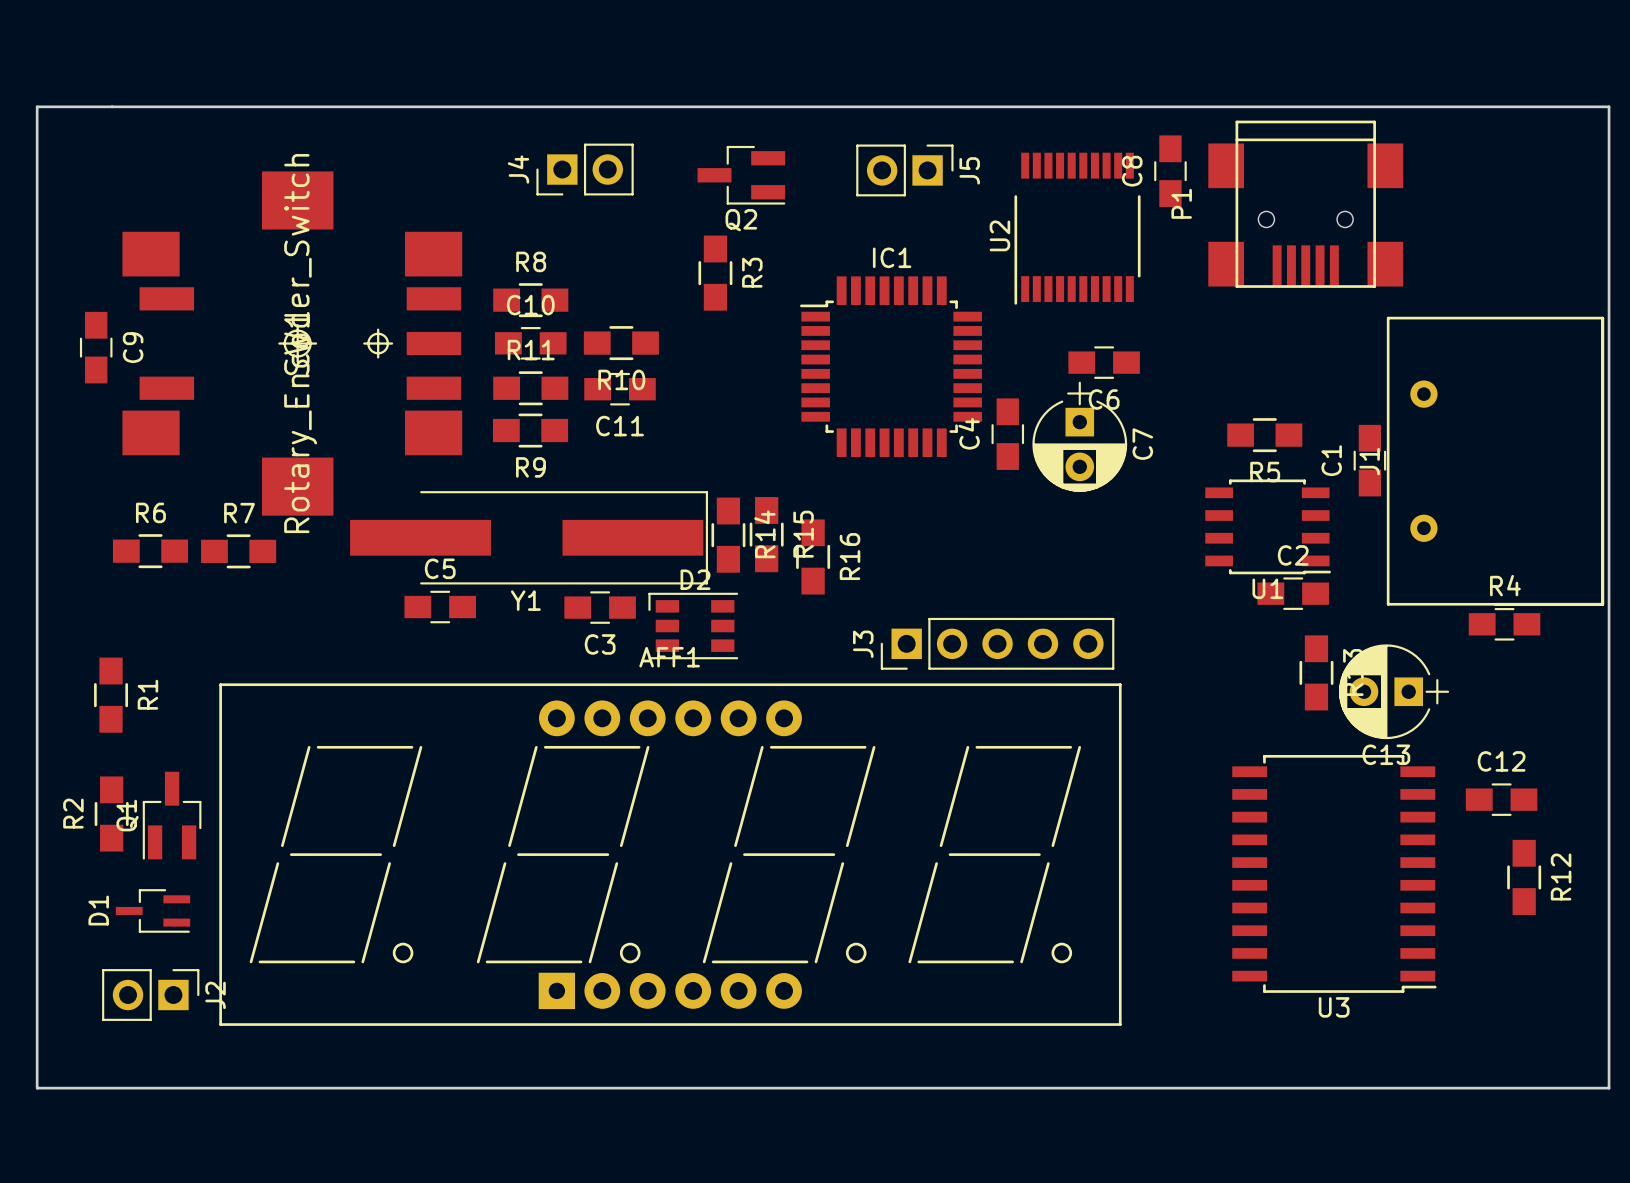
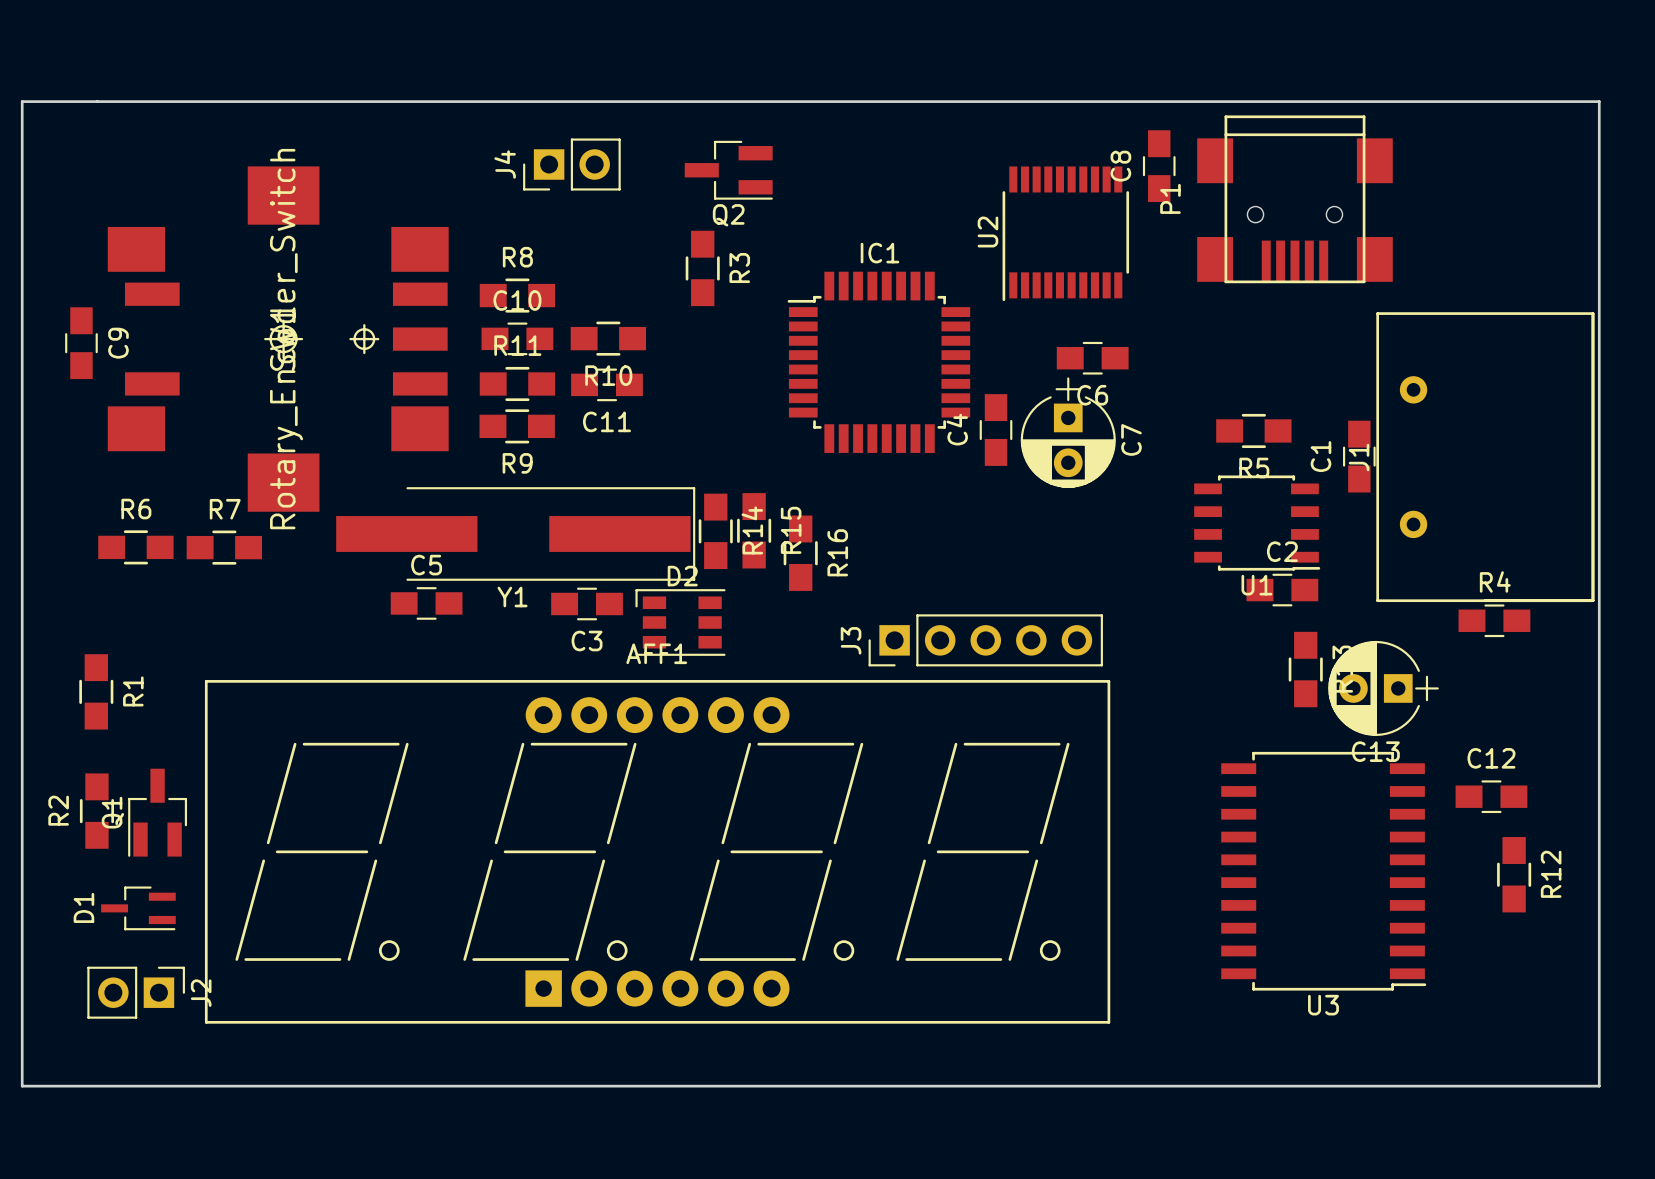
U2 footprint: [1014, 152, 1141, 305] -> [1002, 166, 1130, 302]
J5: (904, 170) -> none

